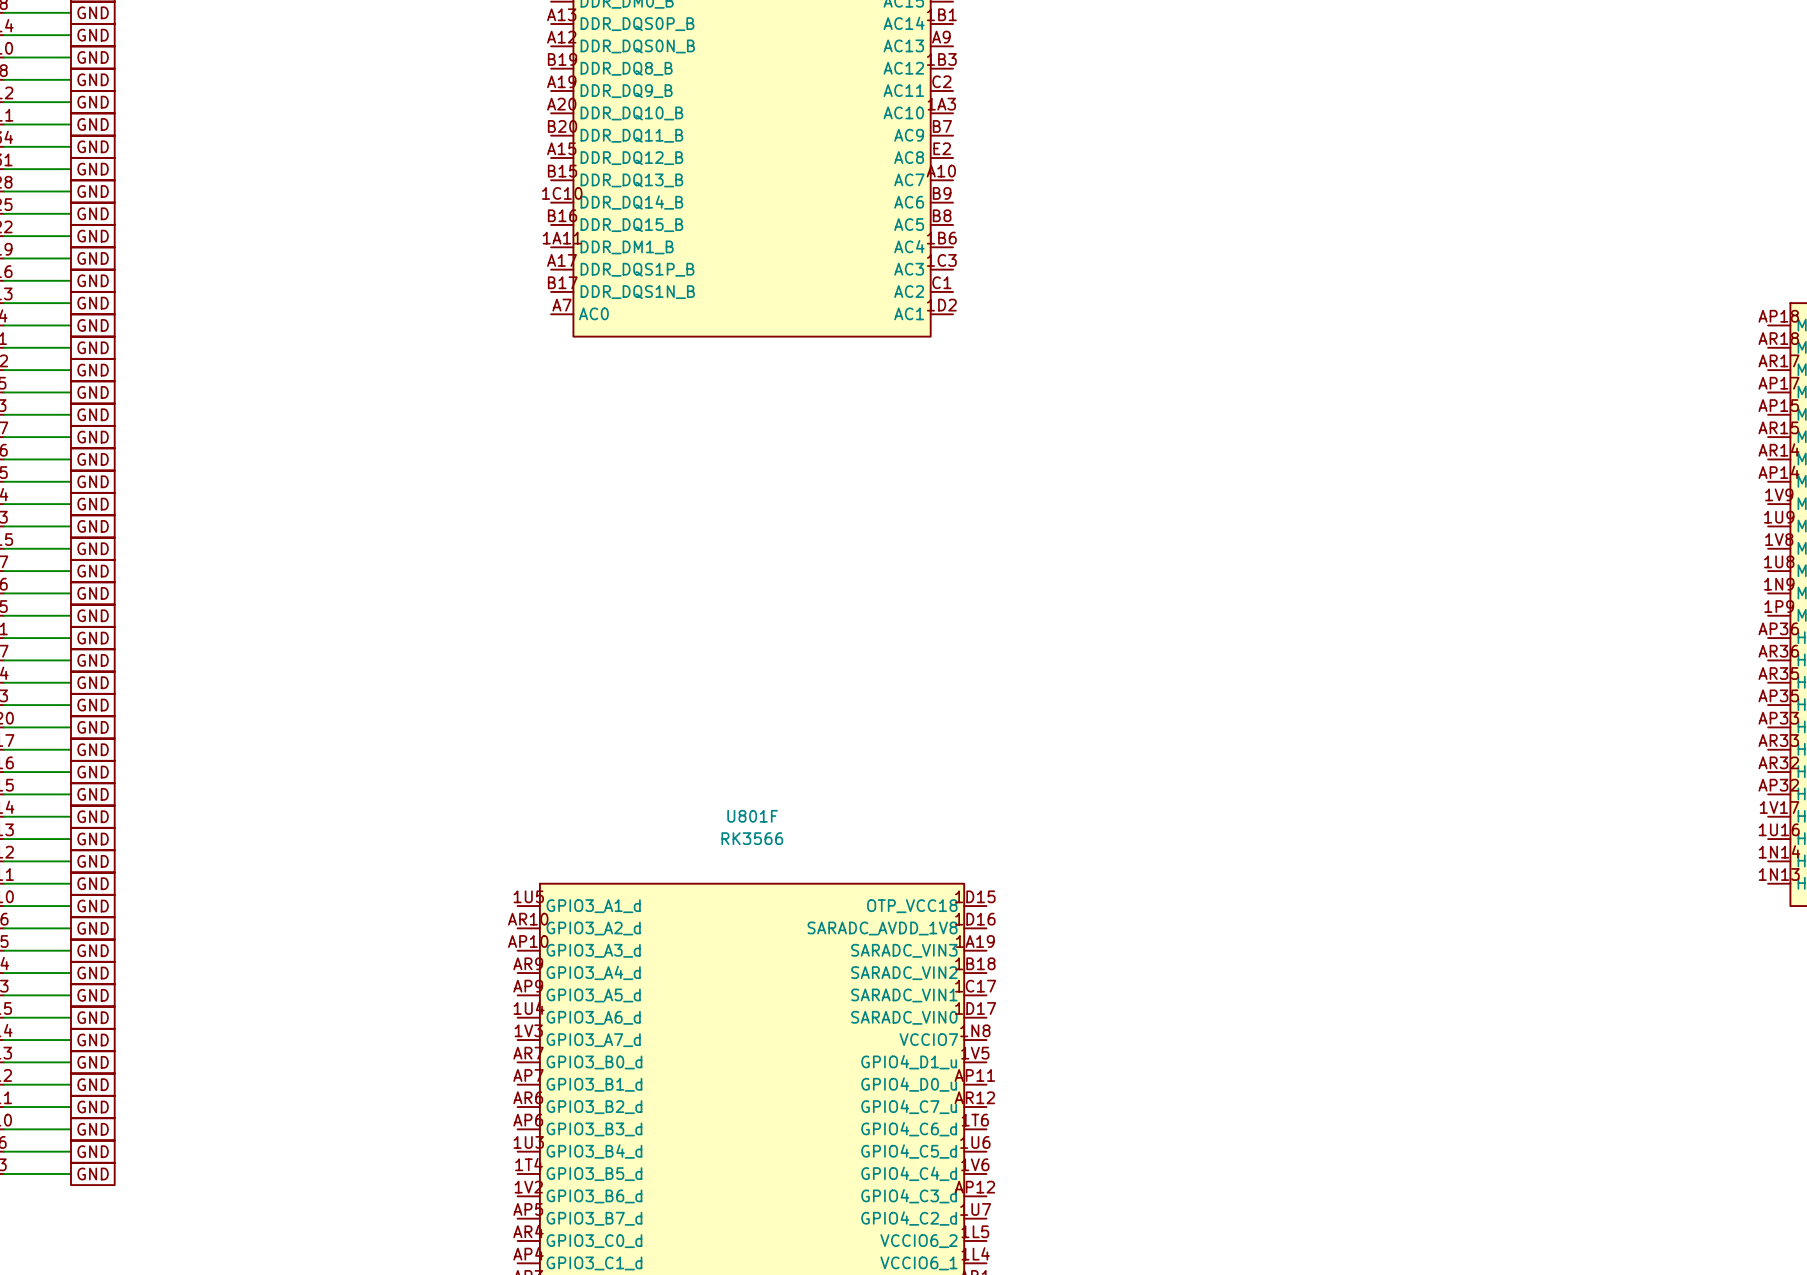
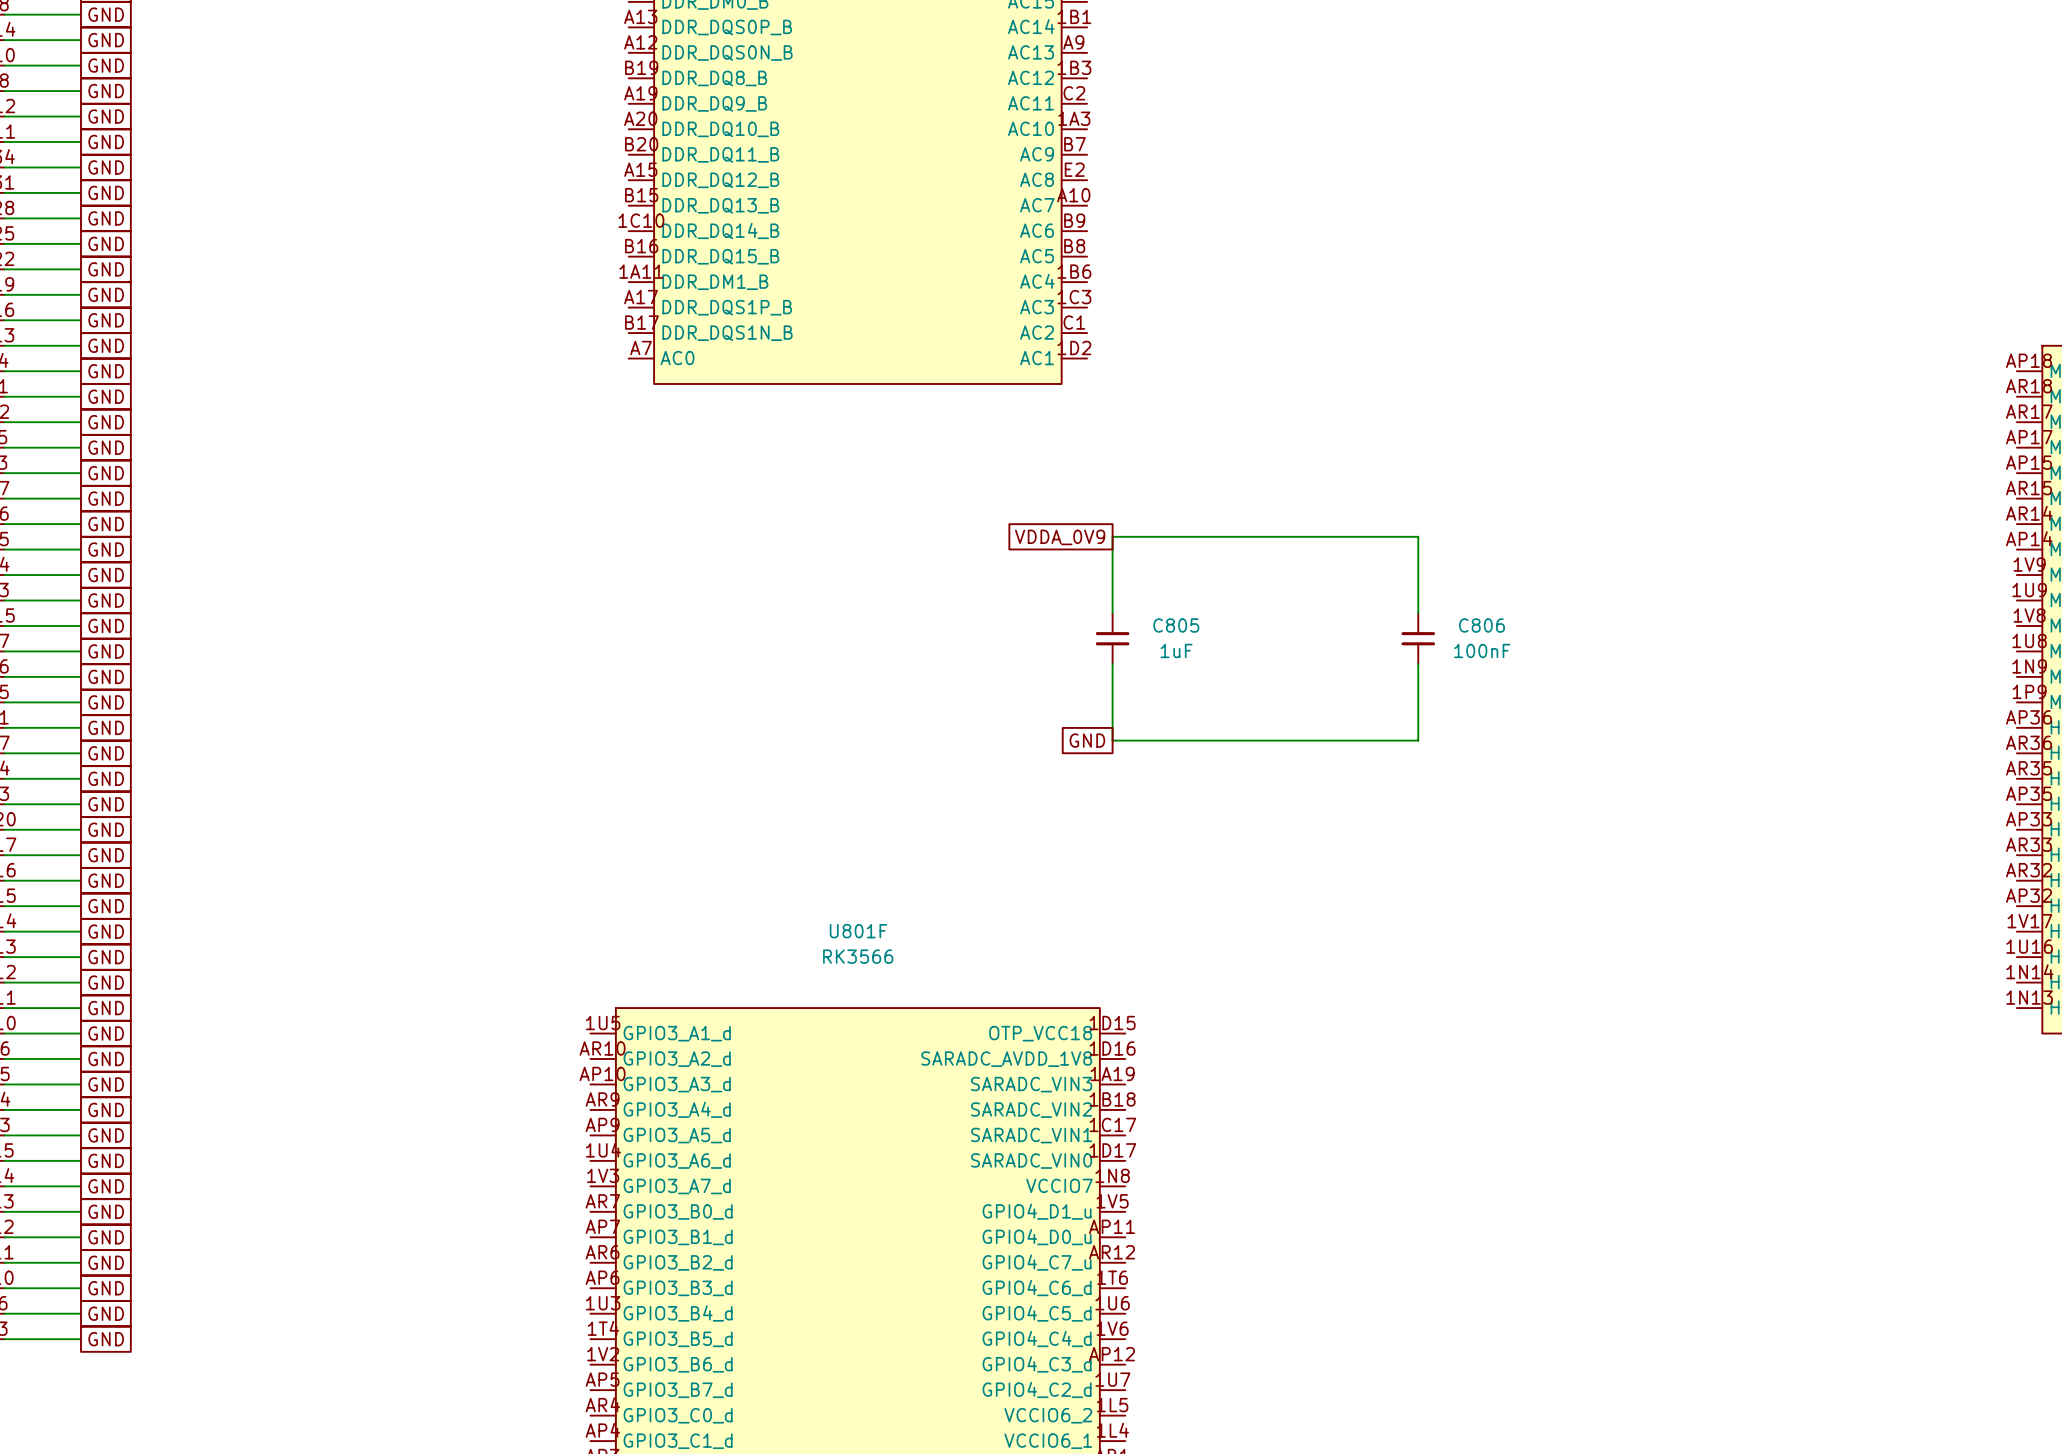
global label: none -> VDDA_0V9 (1060, 537)
wire: none -> (1112, 613) (1112, 536) (1418, 536) (1418, 613)
C805: none -> 1uF (1112, 638)
C806: none -> 100nF (1418, 638)
wire: none -> (1112, 664) (1112, 740) (1418, 740) (1418, 664)
global label: none -> GND (1087, 740)

